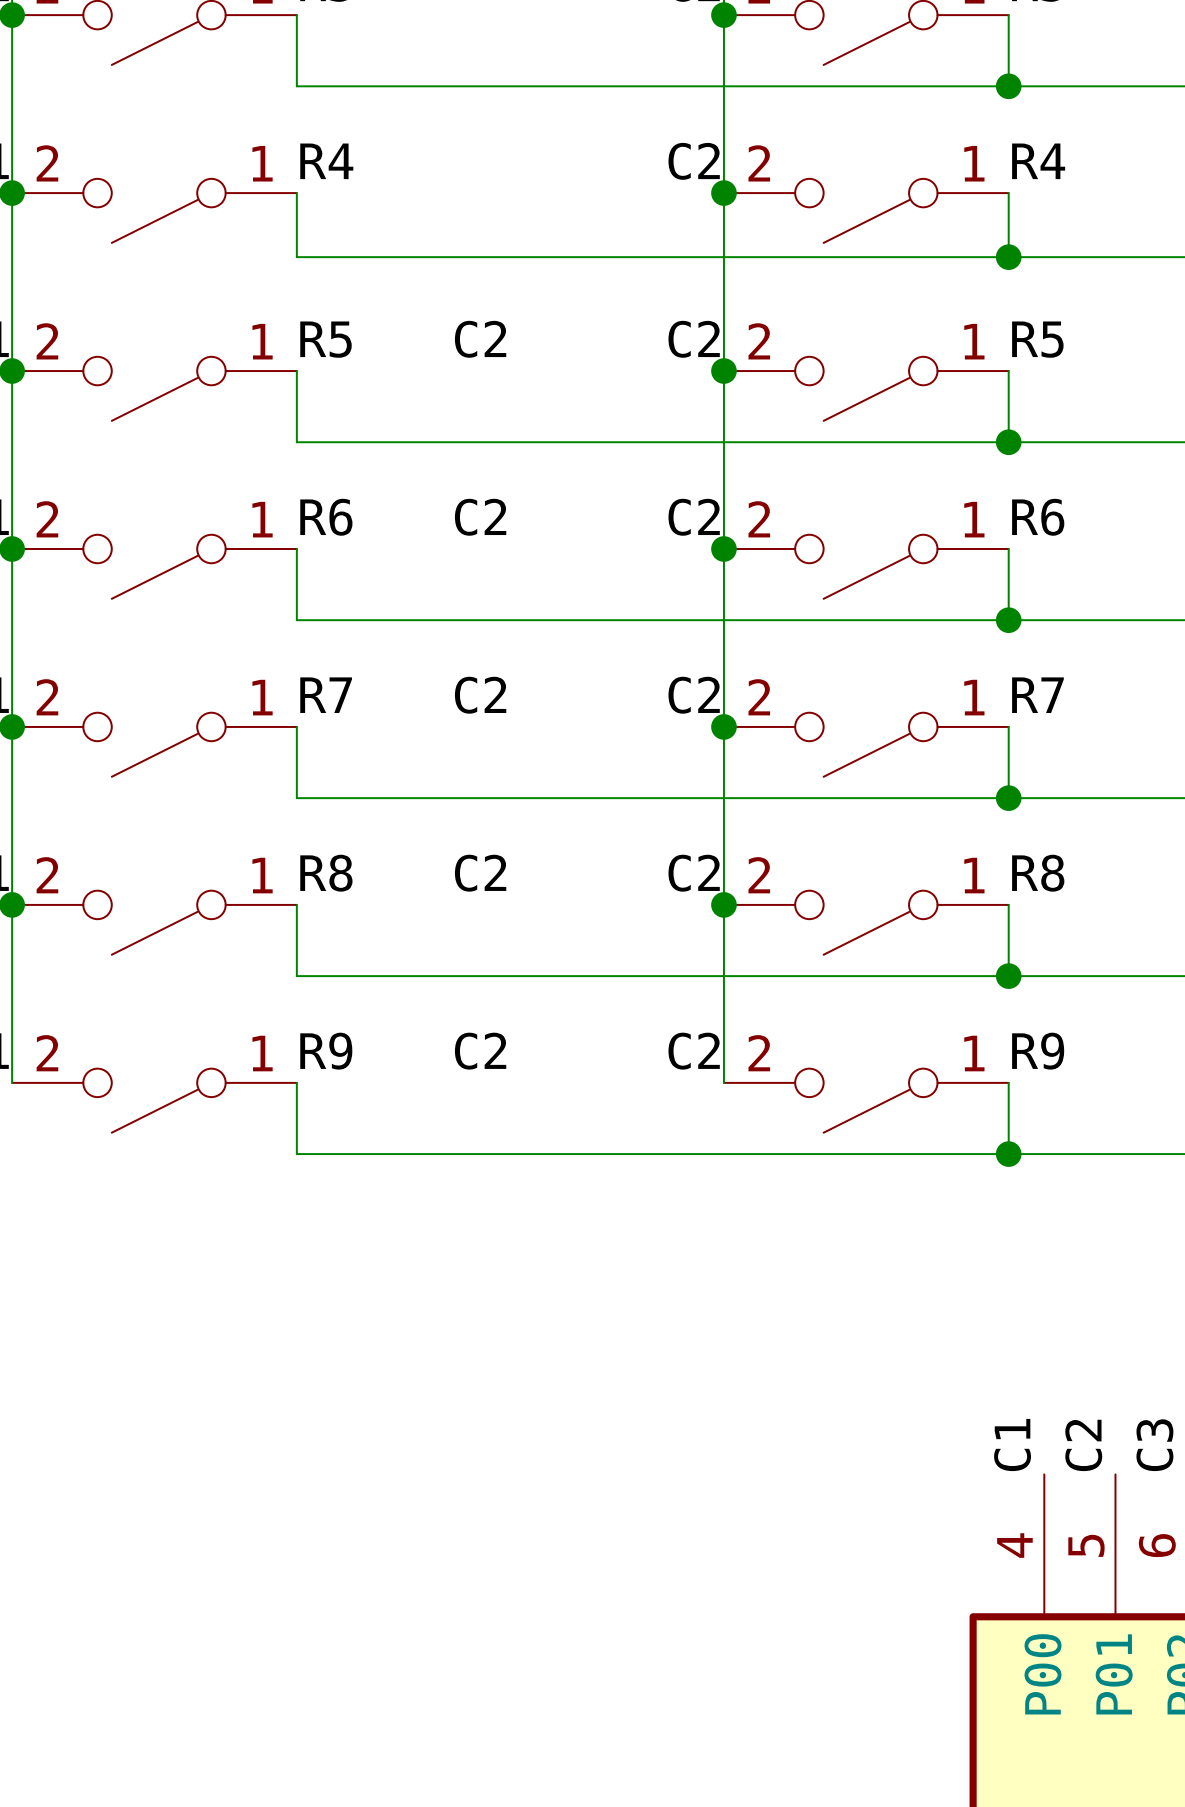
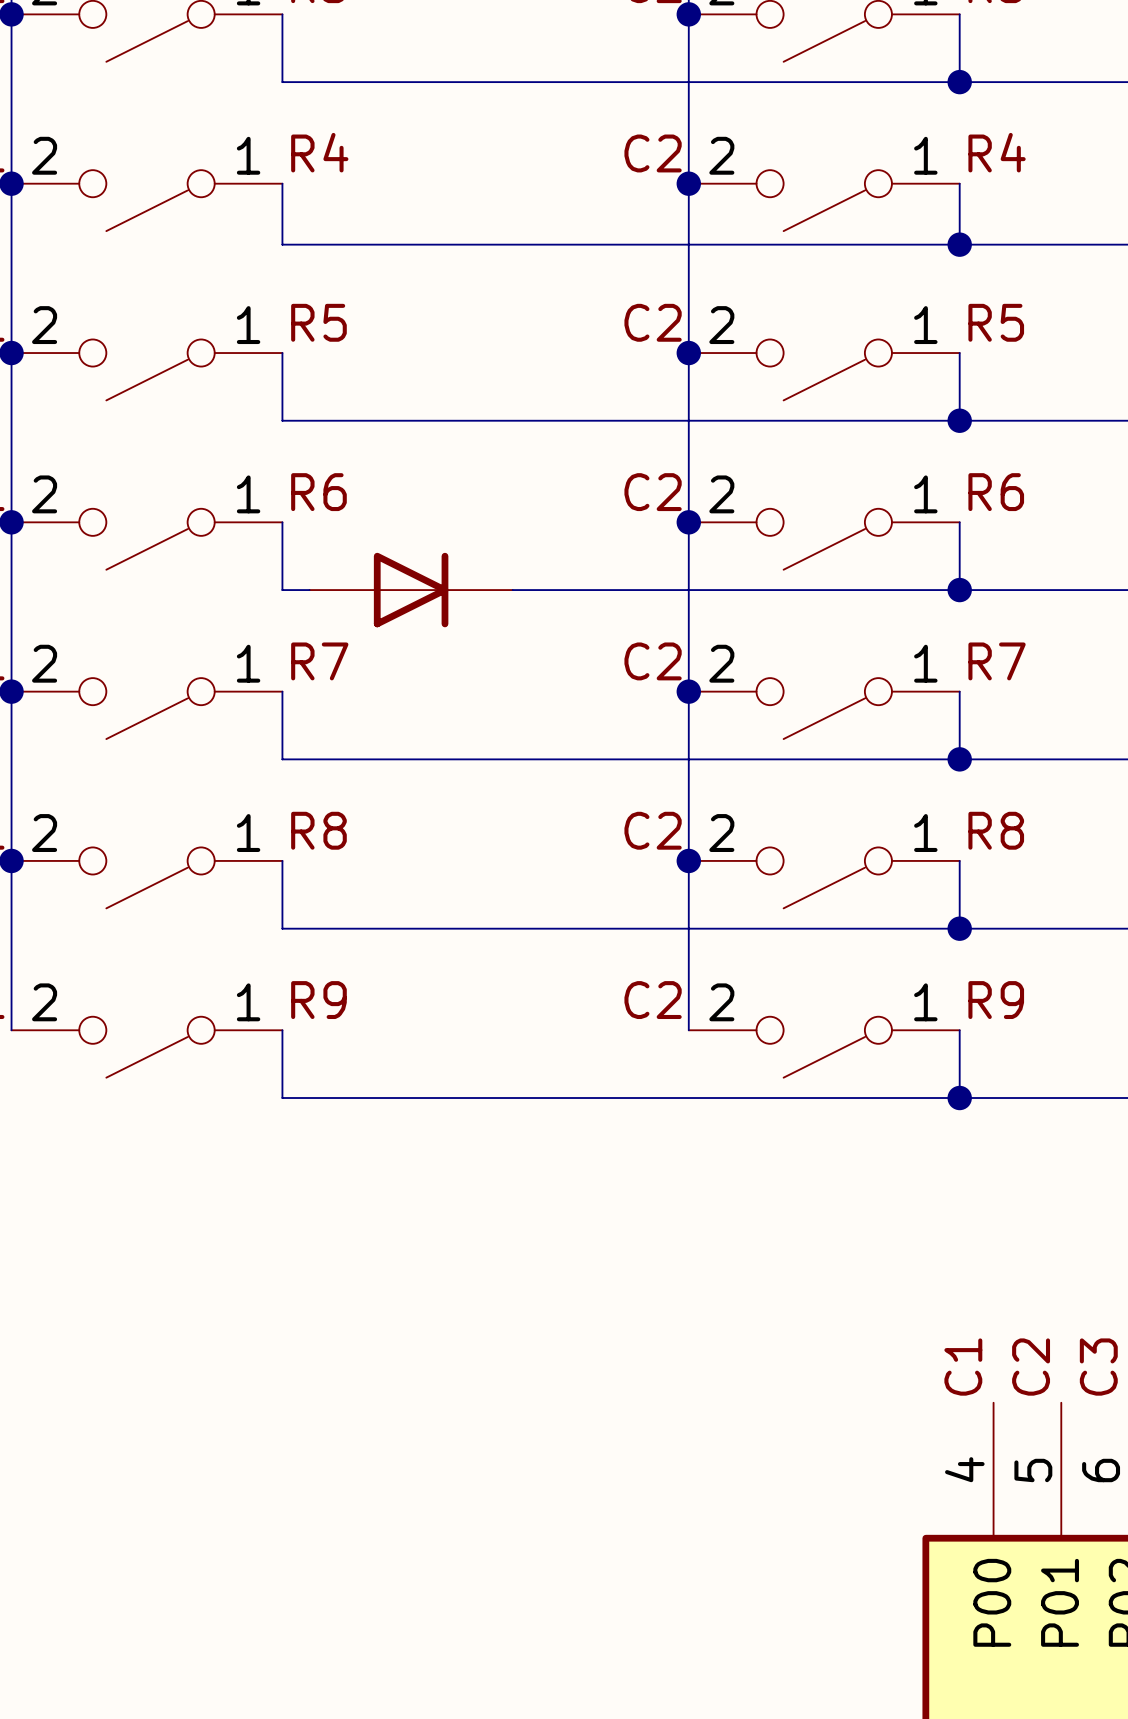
label: C2 (480, 339) -> none
label: C2 (480, 517) -> none
part: none -> (411, 590)
label: C2 (480, 695) -> none
label: C2 (480, 873) -> none
label: C2 (480, 1051) -> none

